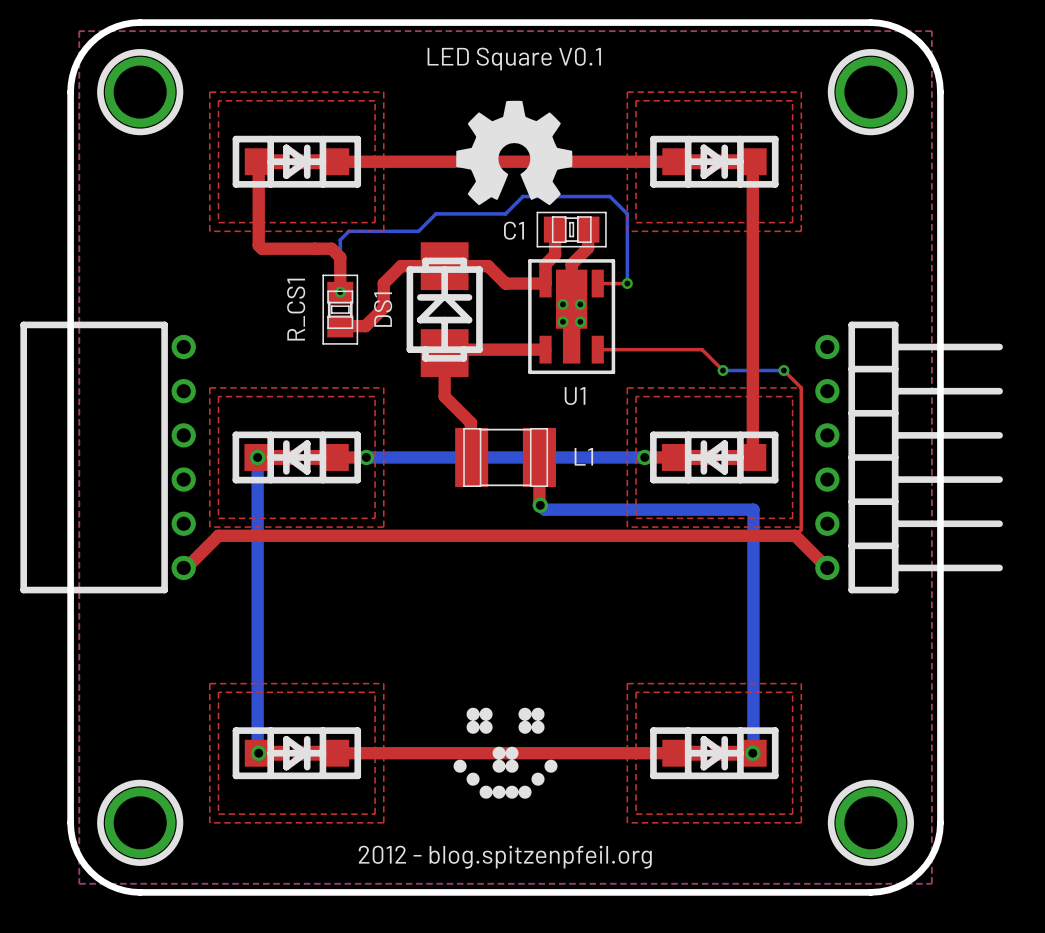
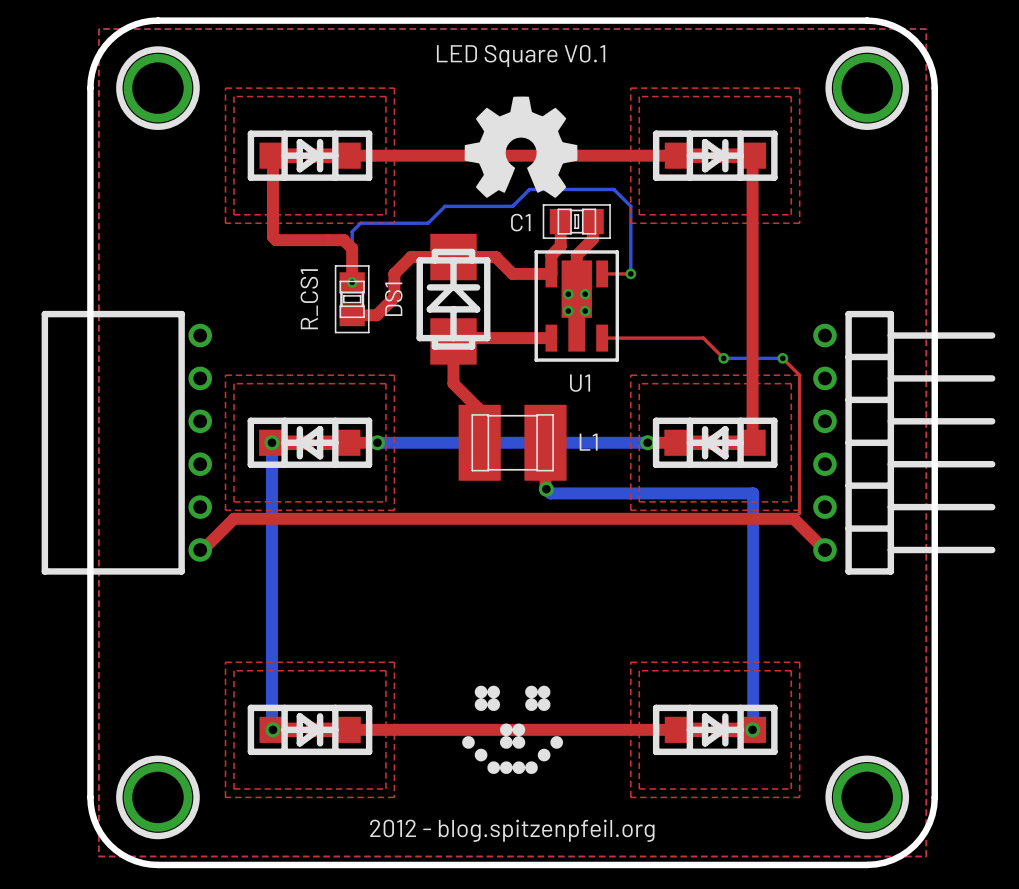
L1 footprint: [455, 427, 556, 488] -> [458, 404, 567, 481]

